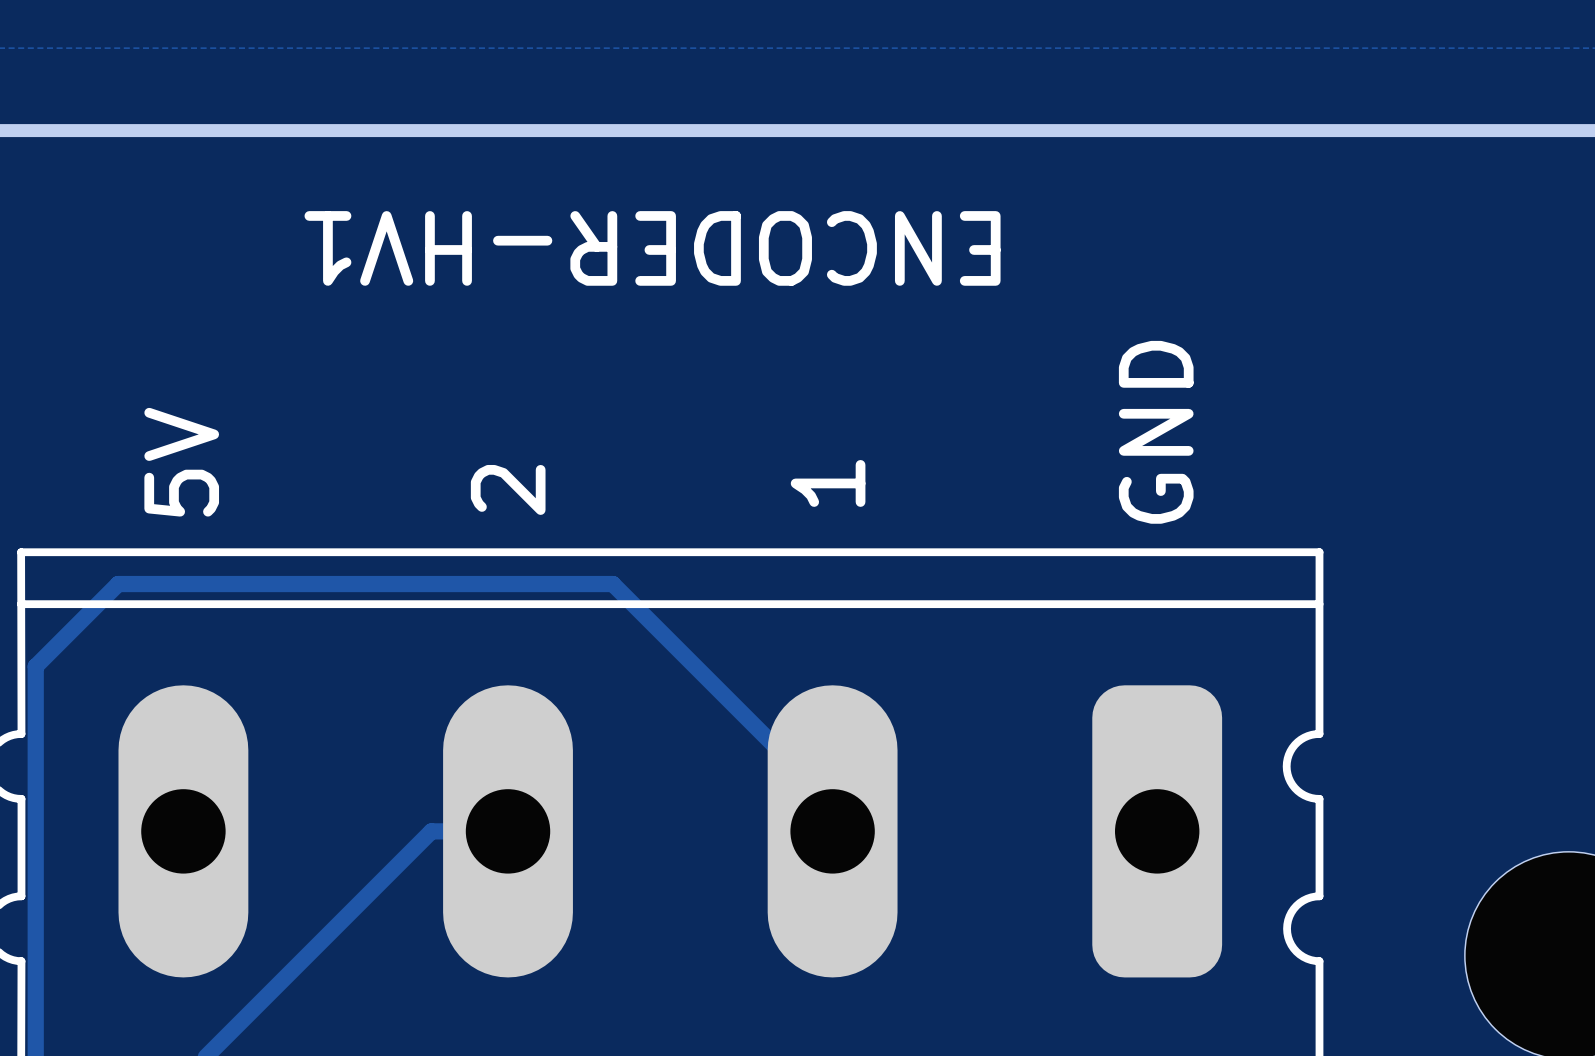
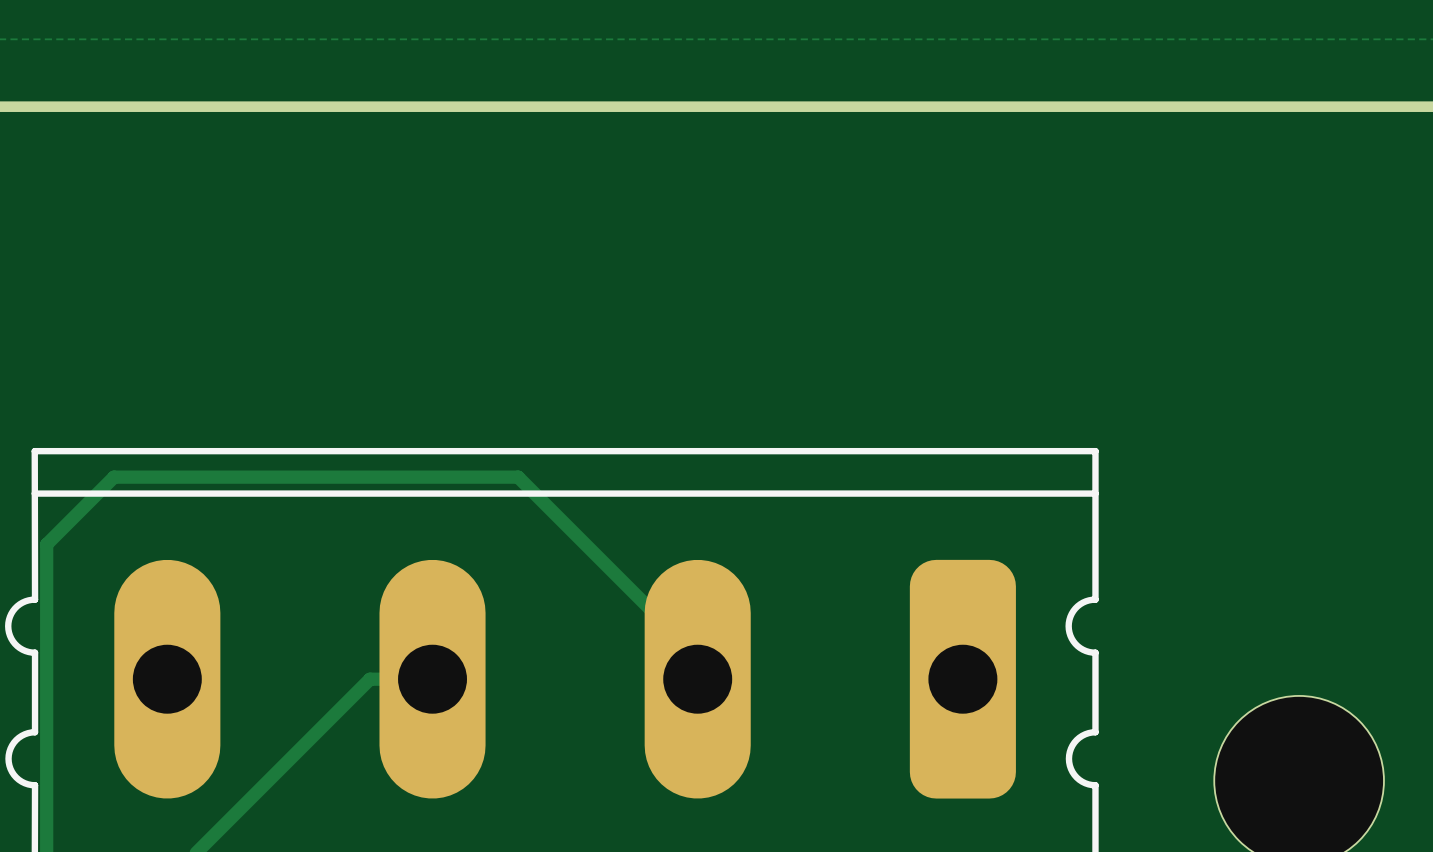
text: ENCODER-HV1 (652, 248) -> none
text: GND (1156, 432) -> none
text: 5V (181, 462) -> none
text: 1 (828, 483) -> none
text: 2 (508, 489) -> none

